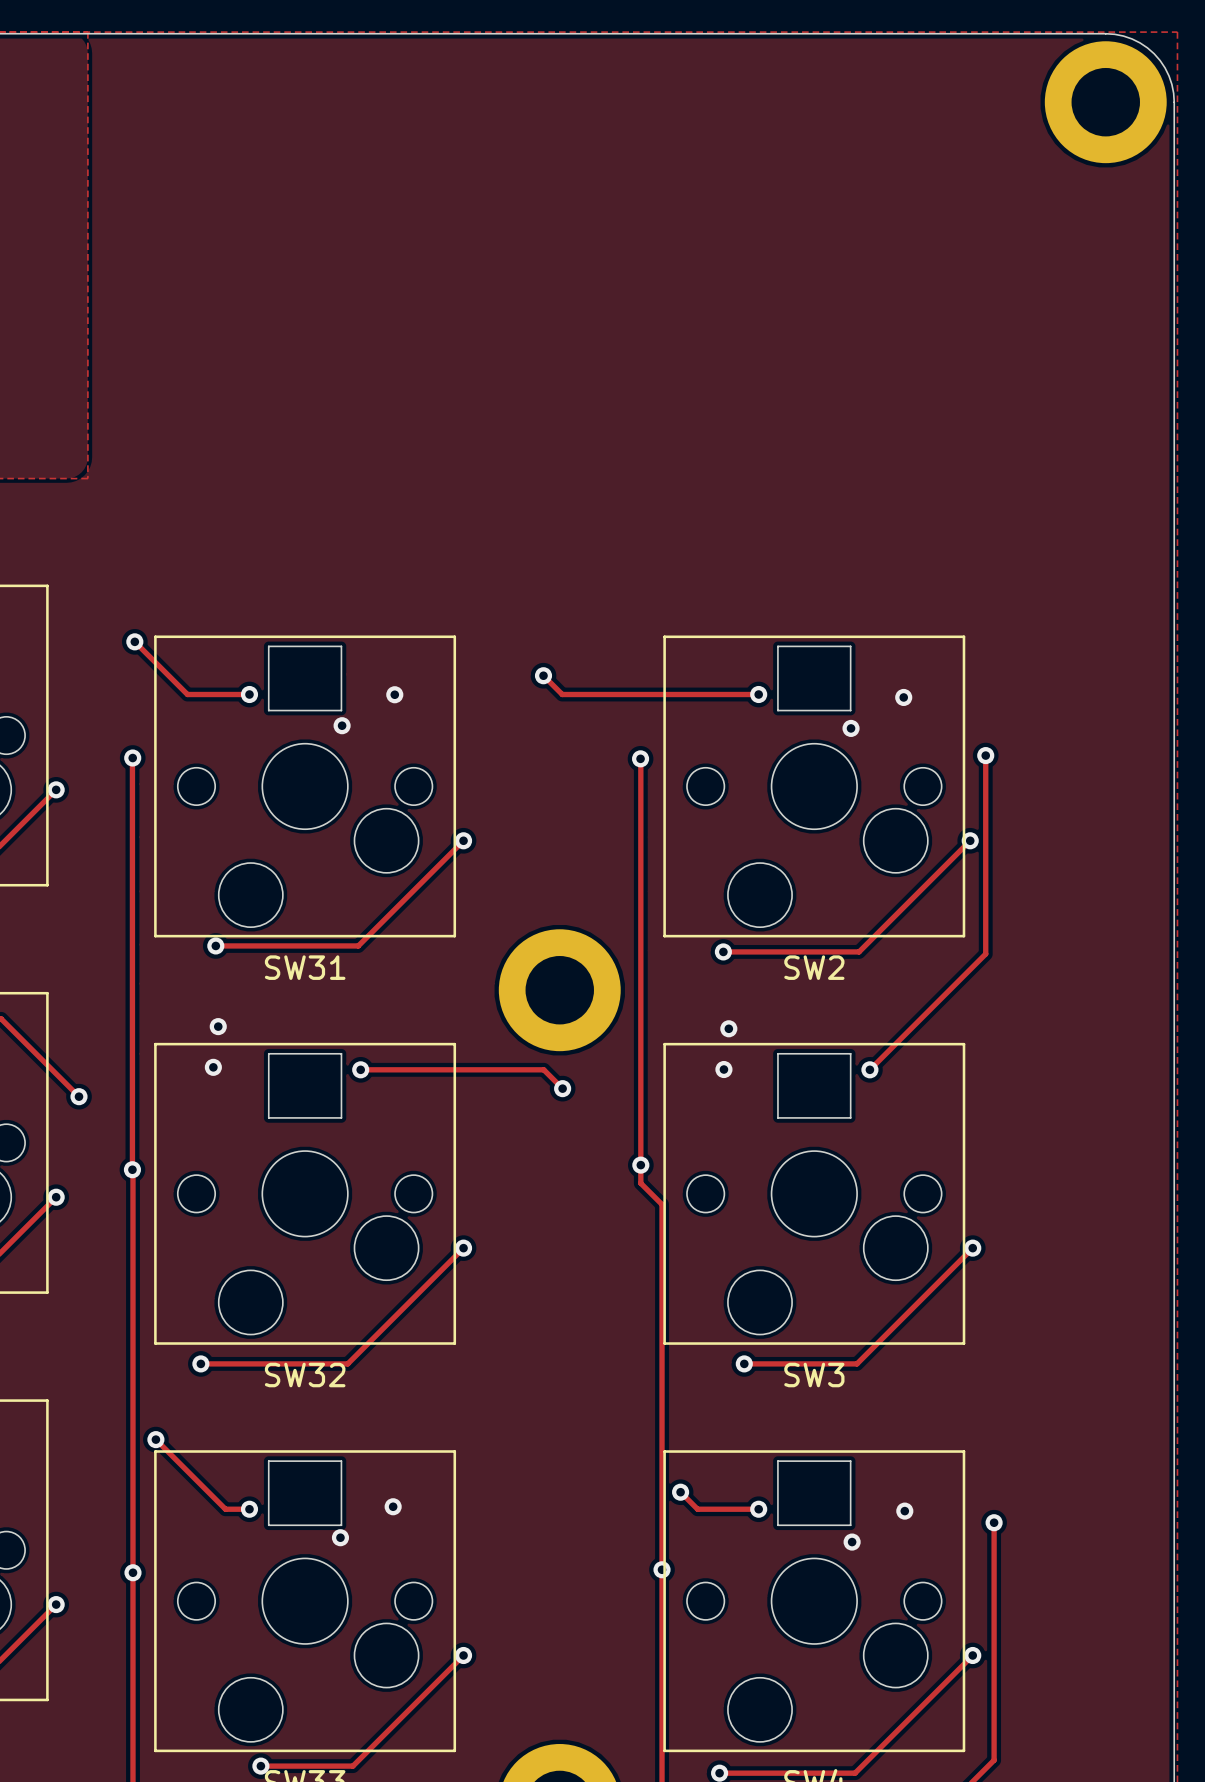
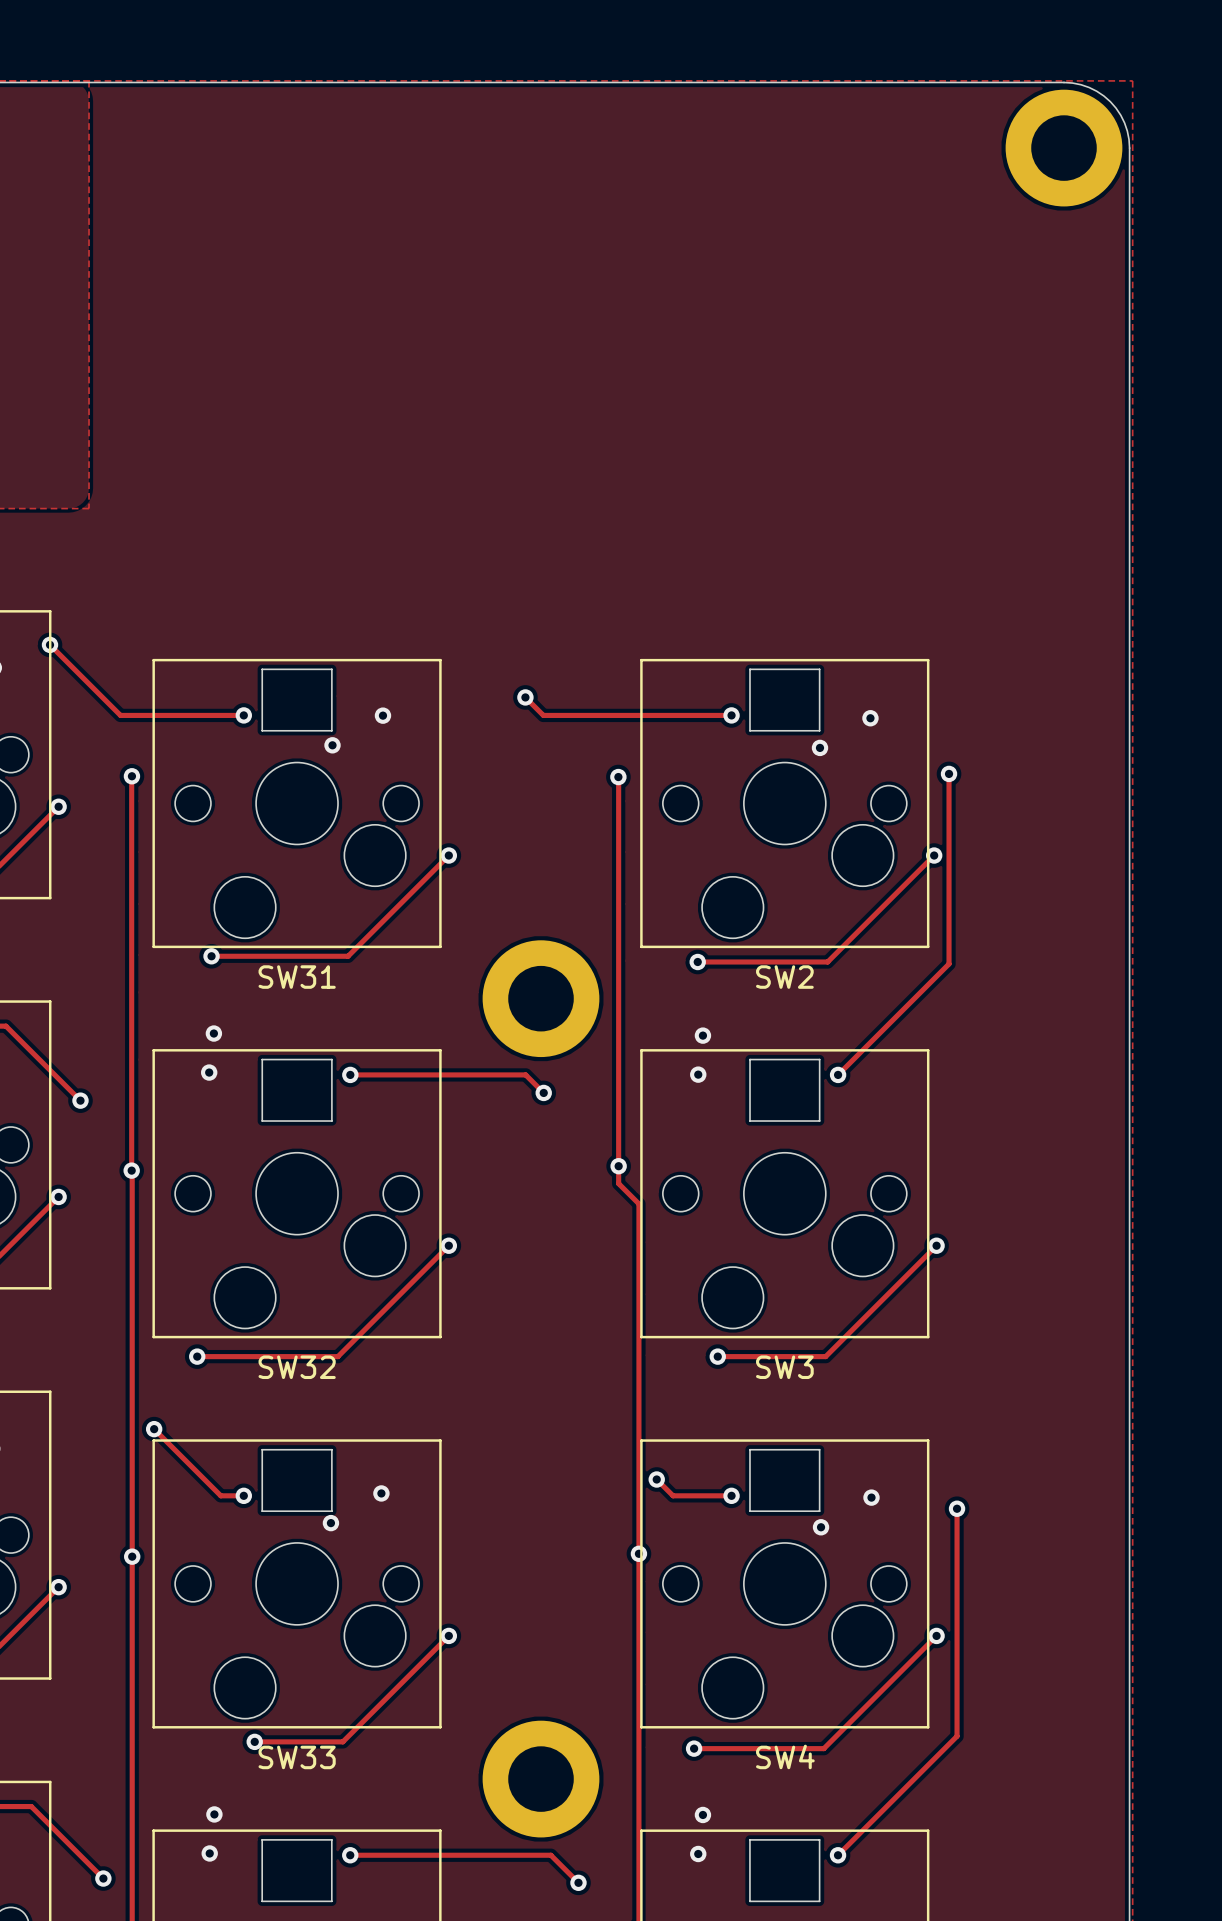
track: (134, 641) (187, 694) -> (50, 644) (120, 715) (184, 715)
via position: (134, 641) -> (50, 644)

